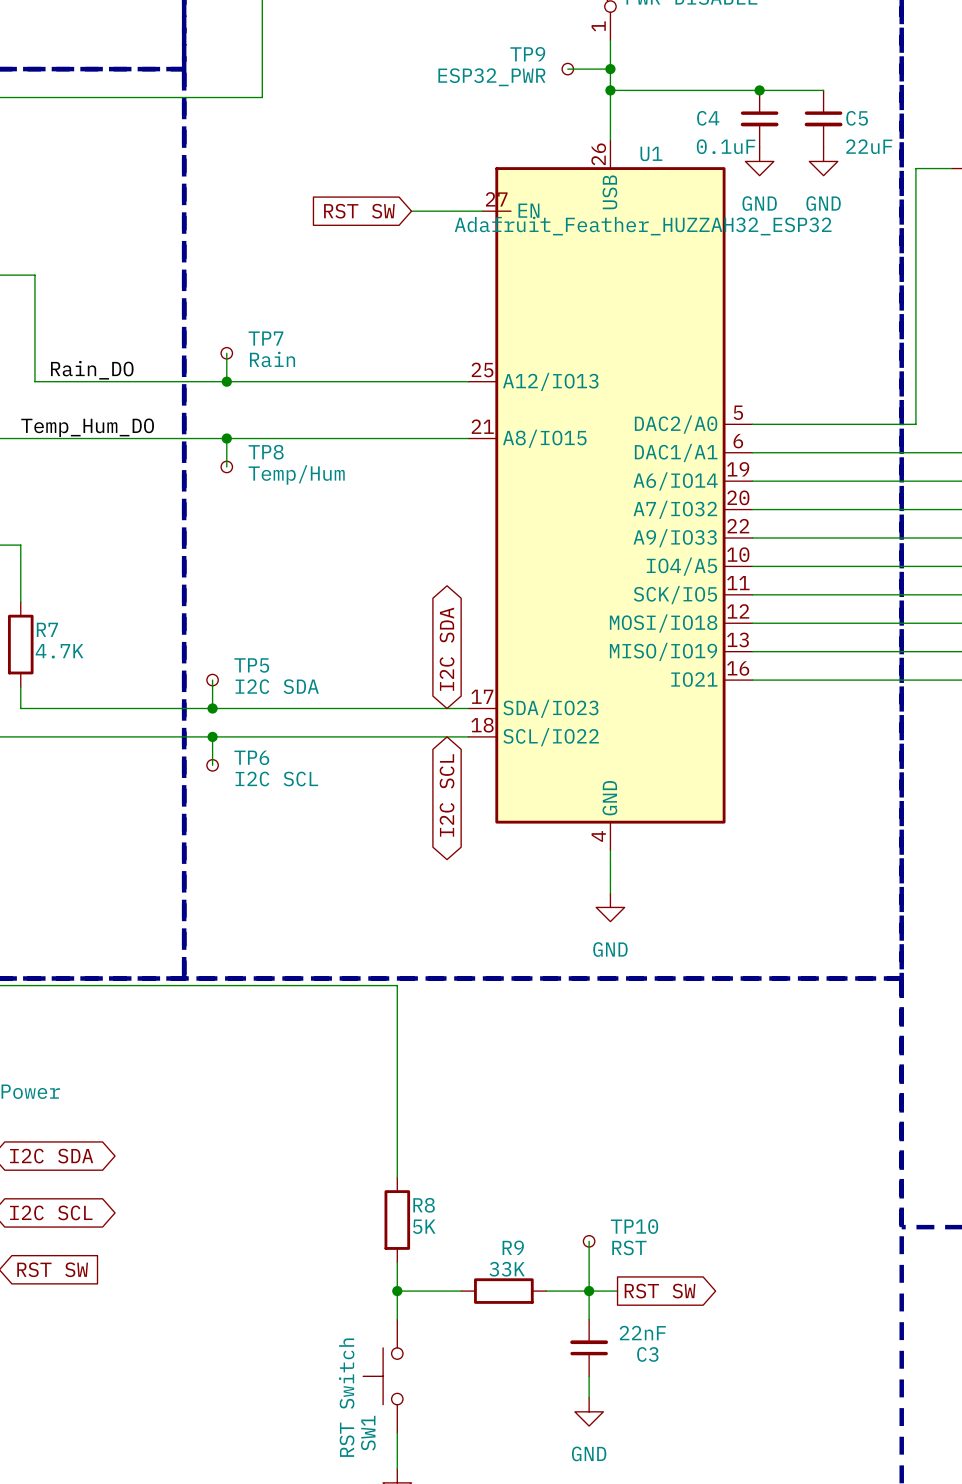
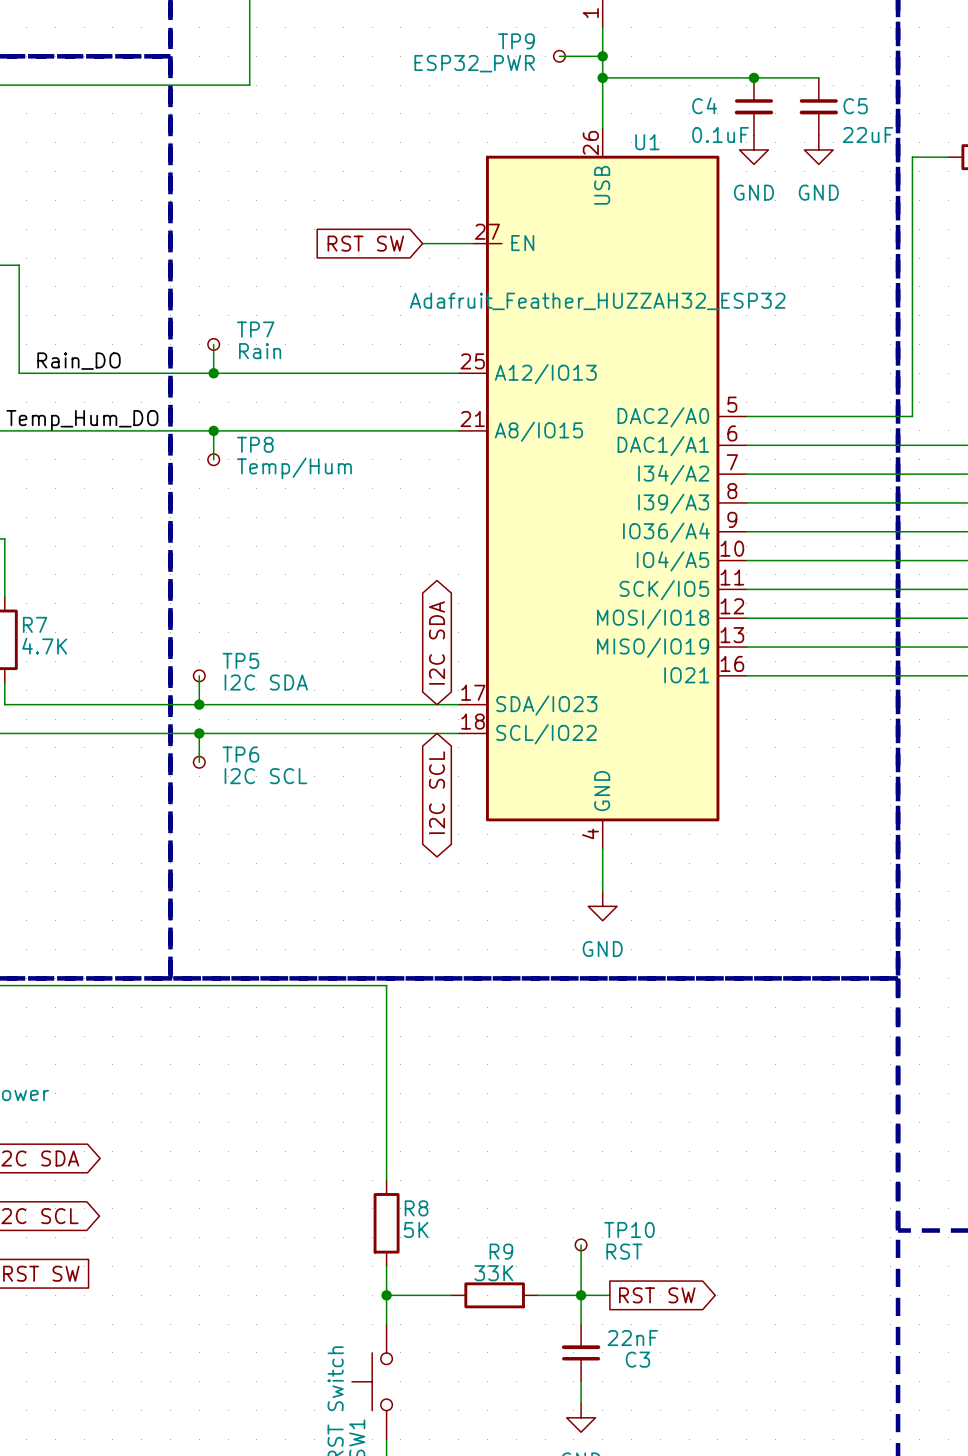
U1 symbol: [468, 140, 753, 851] -> [458, 128, 747, 849]
global label position: RST SW (359, 211) -> RST SW (365, 243)
wire: (411, 211) (482, 211) -> none
U1 value position: Adafruit_Feather_HUZZAH32_ESP32 (643, 226) -> Adafruit_Feather_HUZZAH32_ESP32 (597, 301)
wire: none -> (422, 243) (473, 243)

